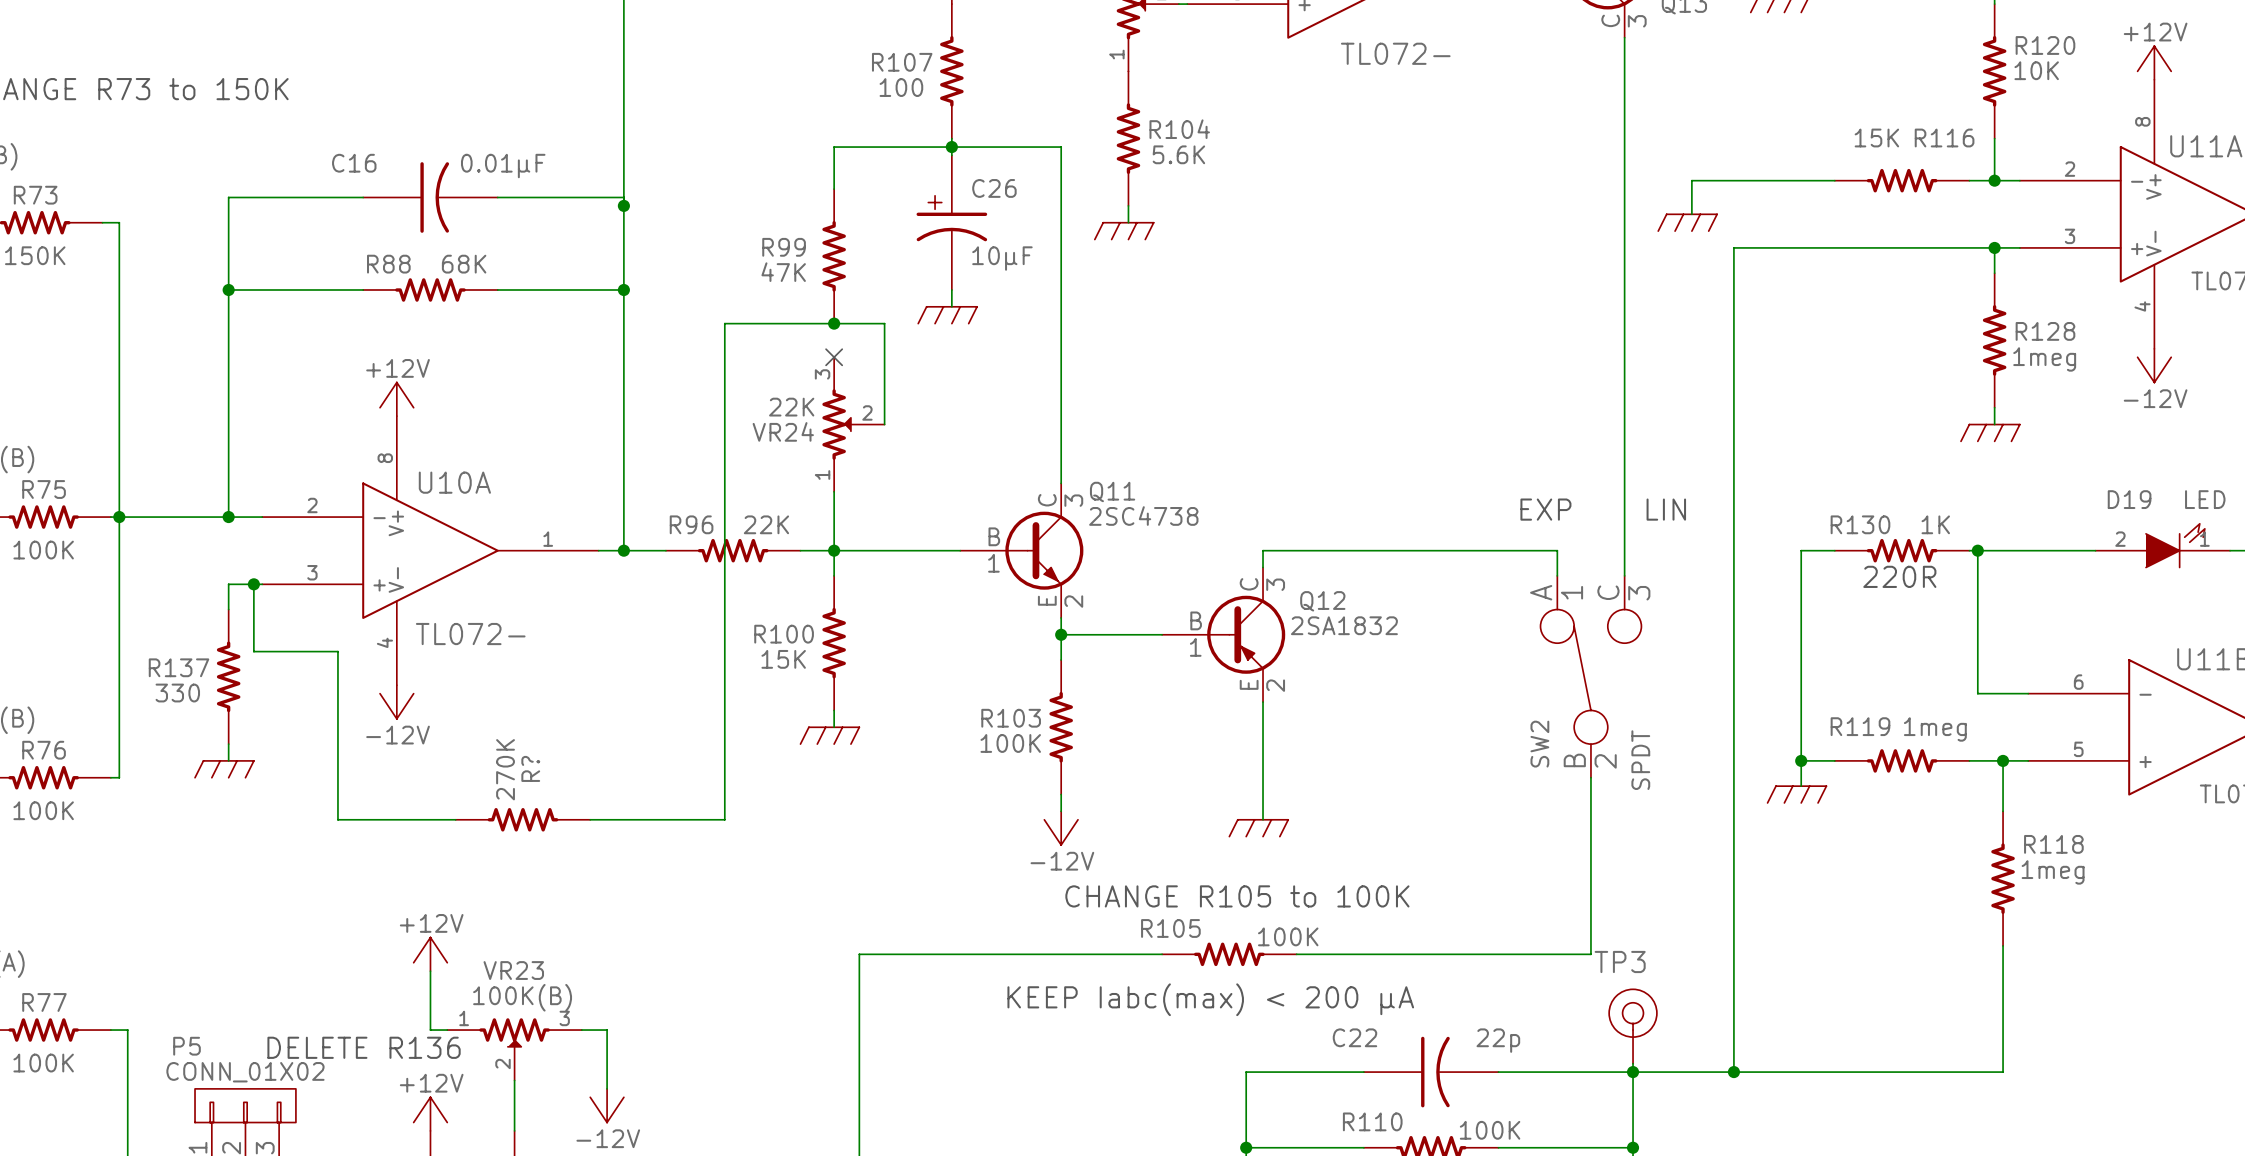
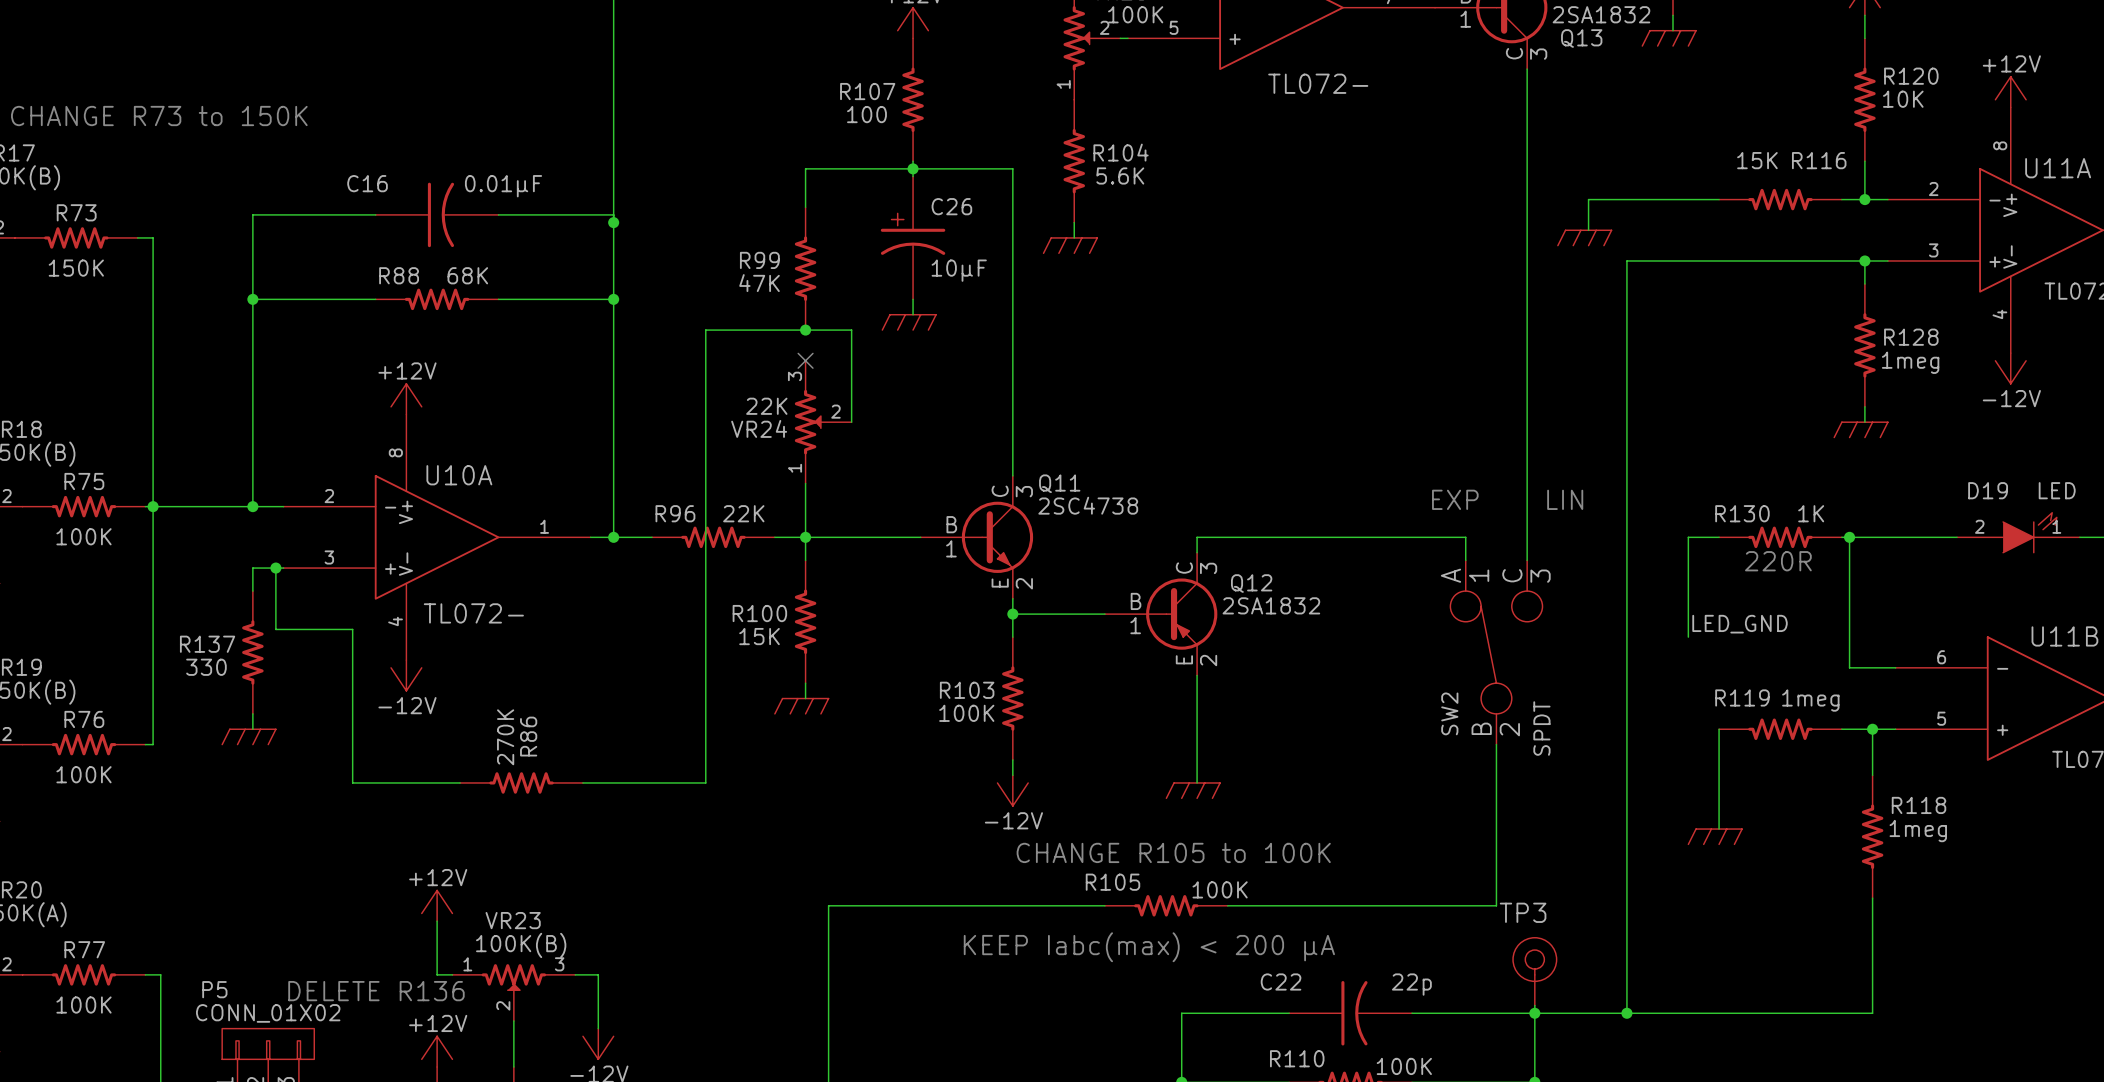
label: none -> LED_GND (1740, 624)
wire: (1801, 660) (1801, 786) -> none
wire: (1801, 760) (1834, 760) -> (1719, 829) (1719, 729)
junction: (1801, 760) -> none
R? name: R? (530, 768) -> R86 (528, 736)
power symbol position: (1797, 794) -> (1715, 836)

